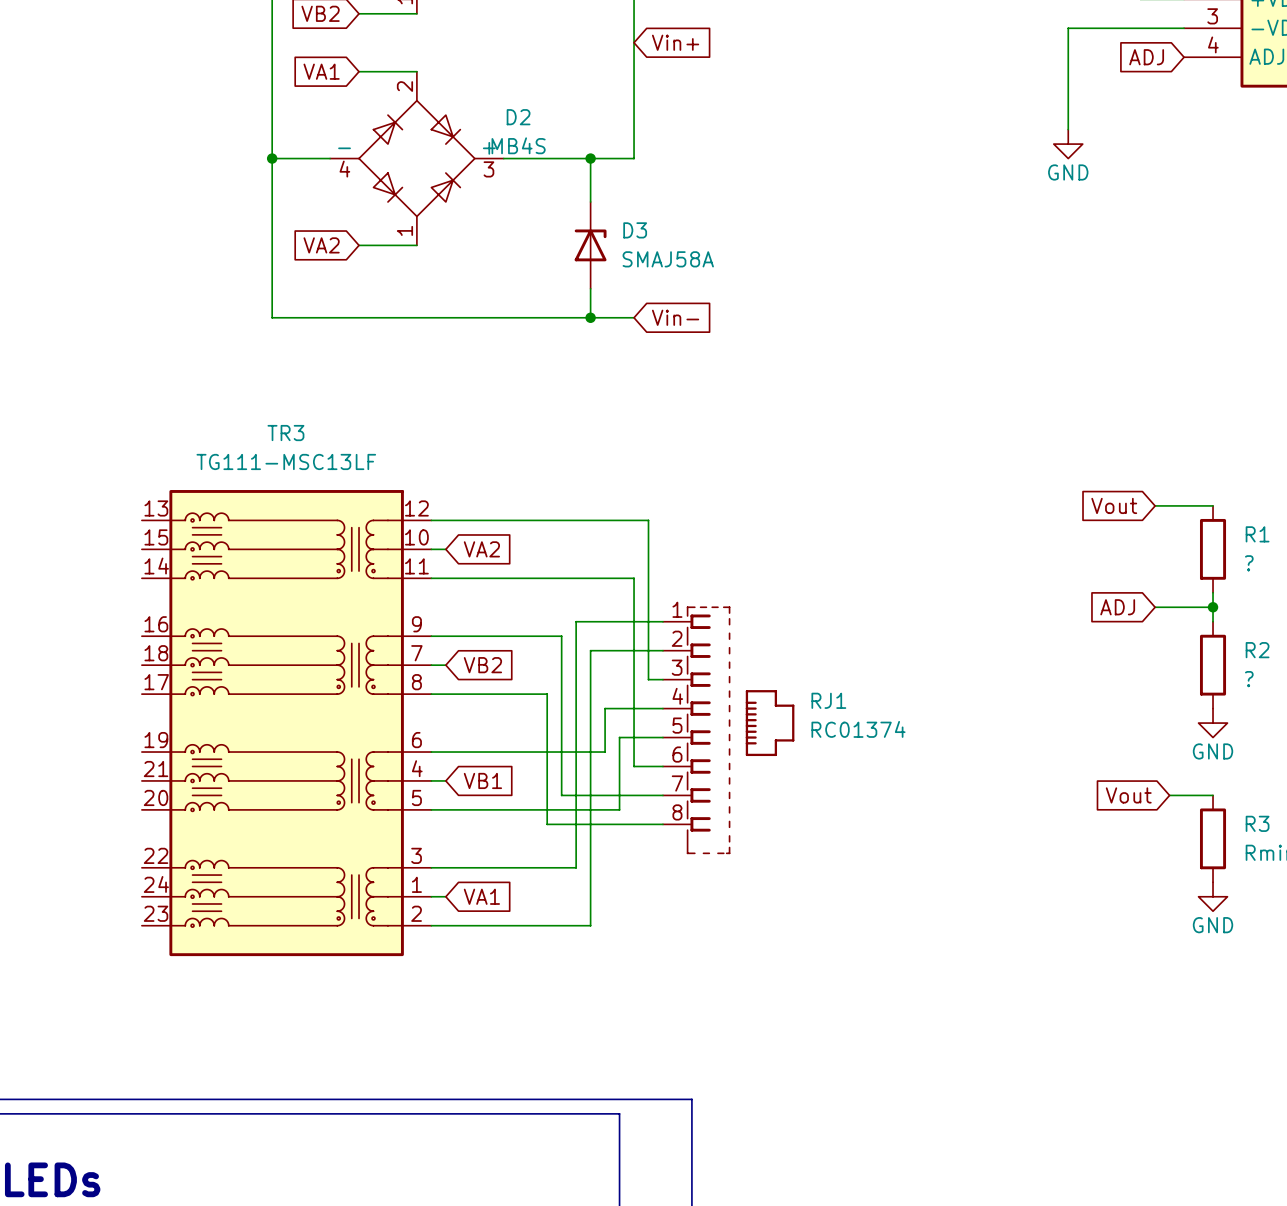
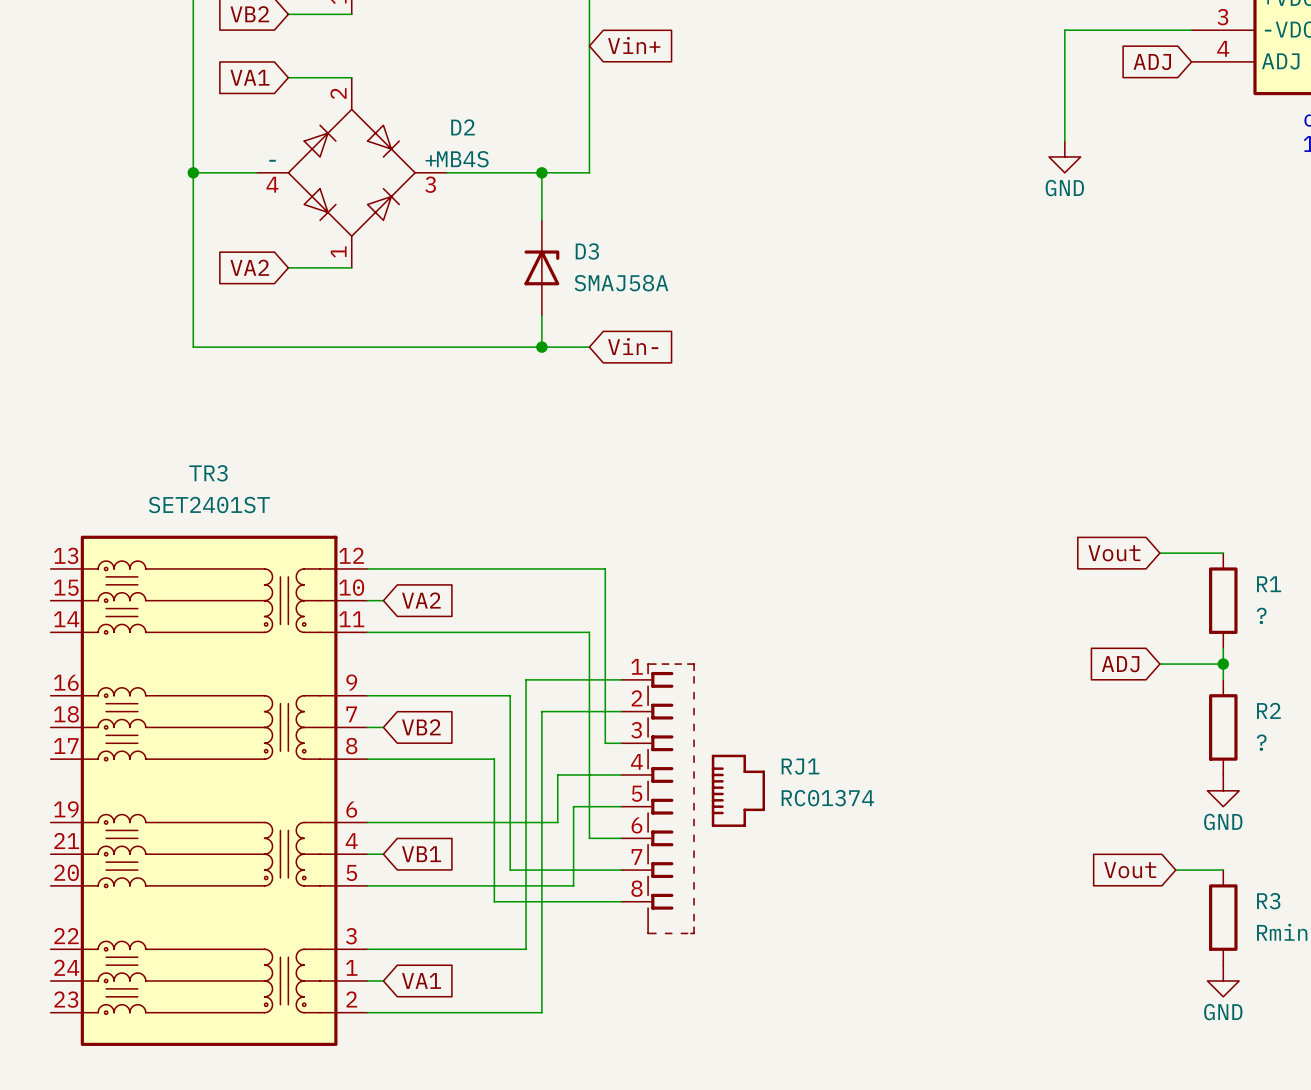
TR3 value: TG111-MSC13LF (286, 461) -> SET2401ST (209, 505)

